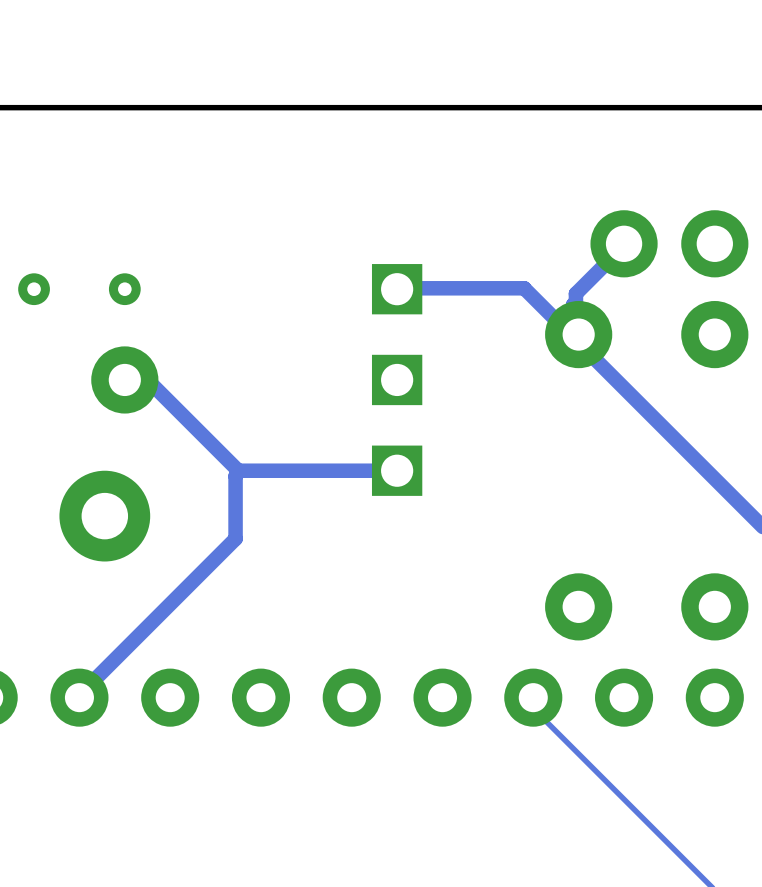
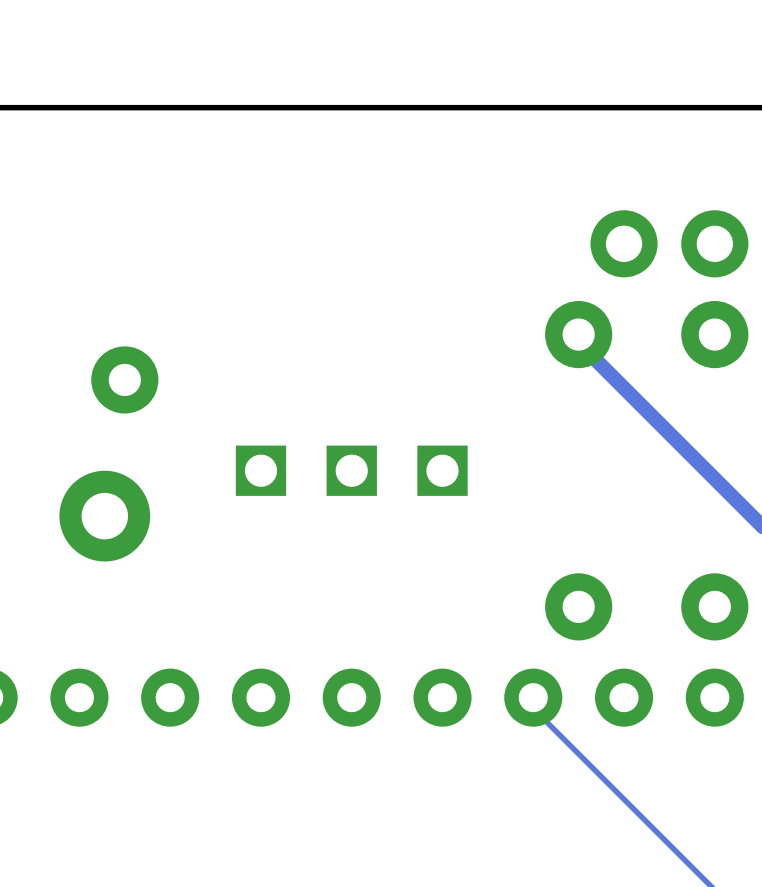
track: (624, 243) (575, 293) (575, 301) (573, 304) (575, 307) (575, 329) (578, 334) (570, 320) (556, 320) (524, 288) (397, 289) -> none
part: (34, 289) -> none
part: (124, 289) -> none
track: (124, 379) (148, 380) (238, 470) -> none
part rotation: 0° (397, 379) -> 90° clockwise (351, 470)
track: (238, 470) (235, 476) (235, 538) (77, 696) (79, 697) -> none
track: (397, 470) (238, 470) -> none

